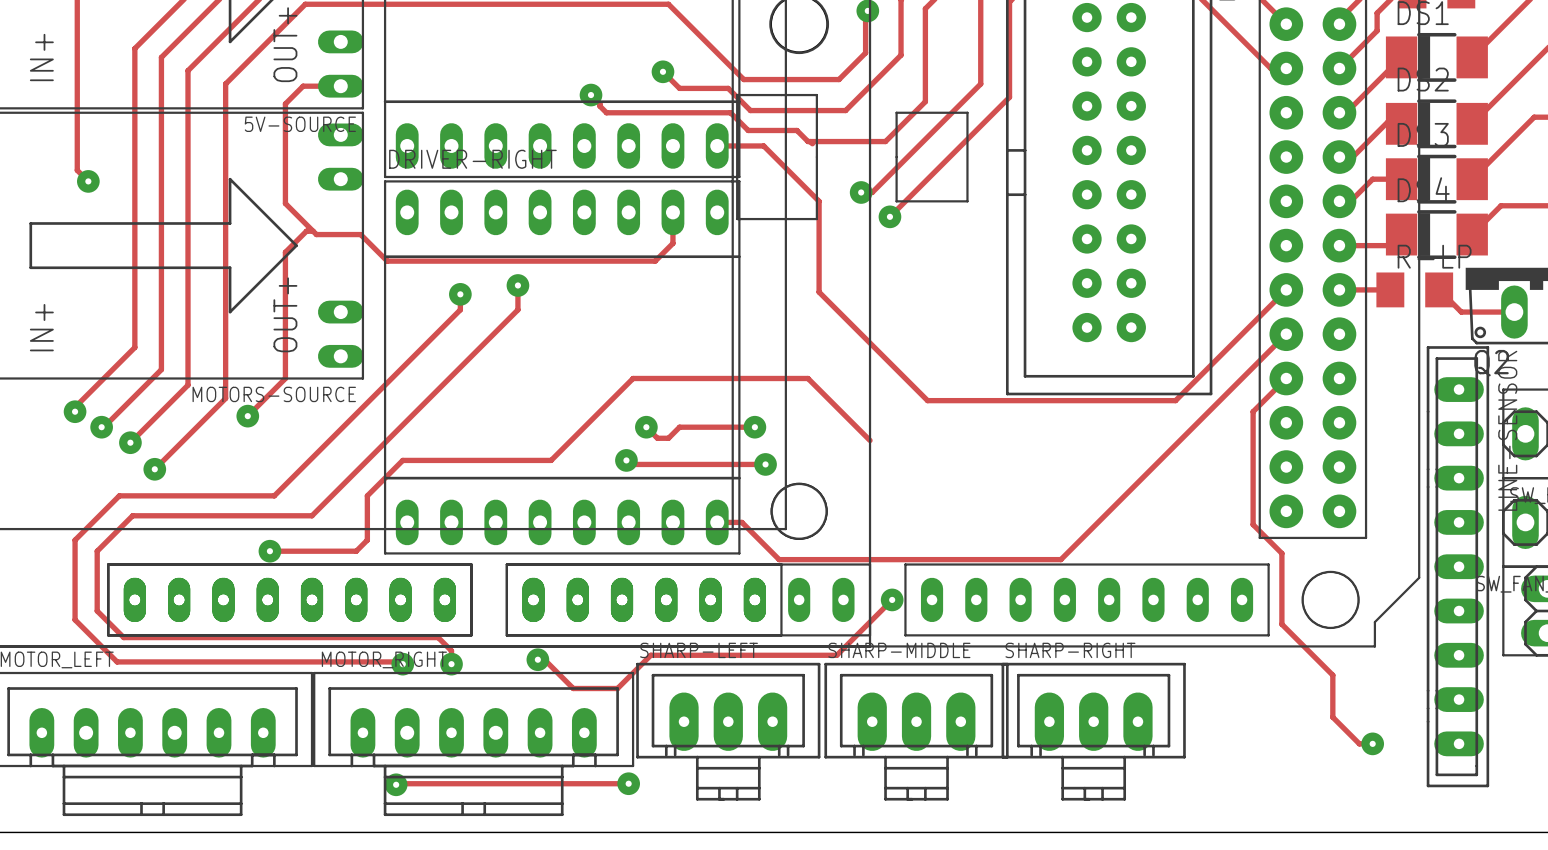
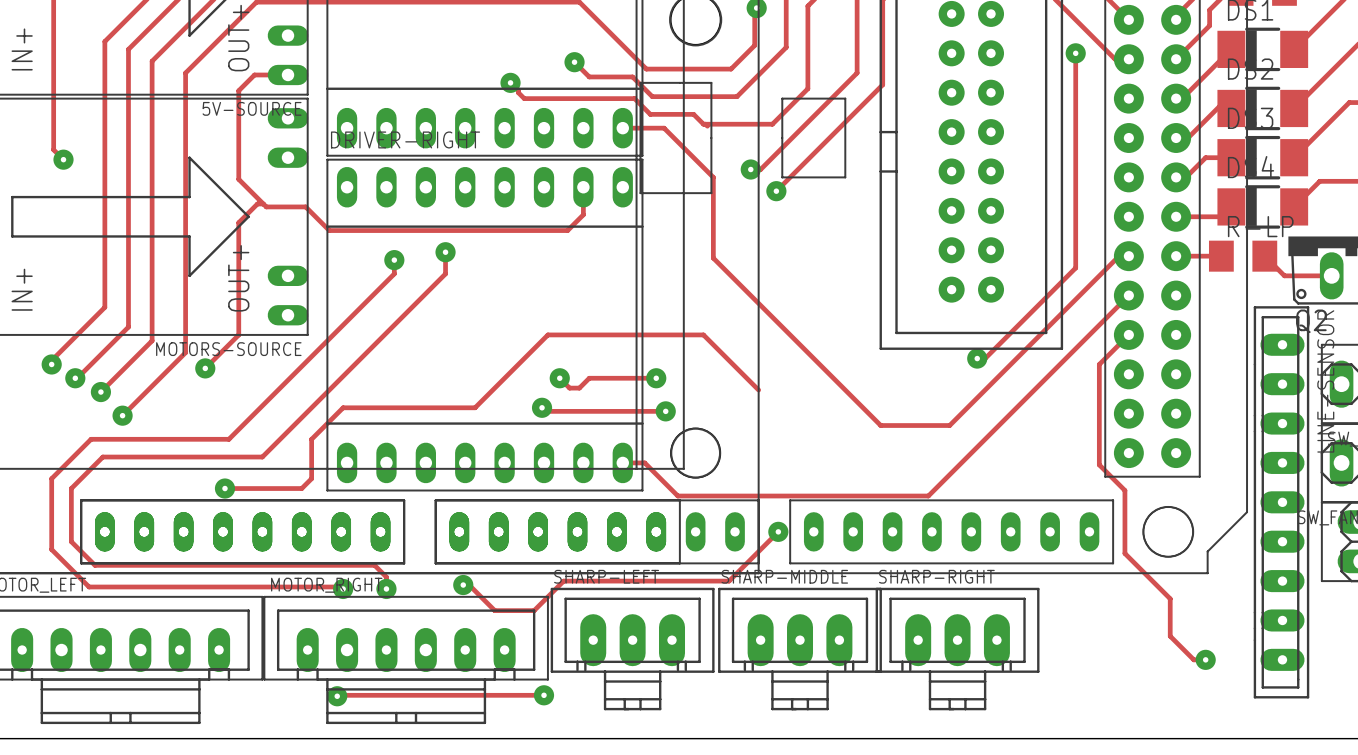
track: none -> (1075, 53) (1075, 267) (985, 358) (975, 358)
via: none -> (1075, 53)
track: (1286, 289) (1175, 400) (927, 400) -> (1128, 256) (1119, 256) (949, 425) (880, 425) (809, 354)
via: none -> (977, 358)

